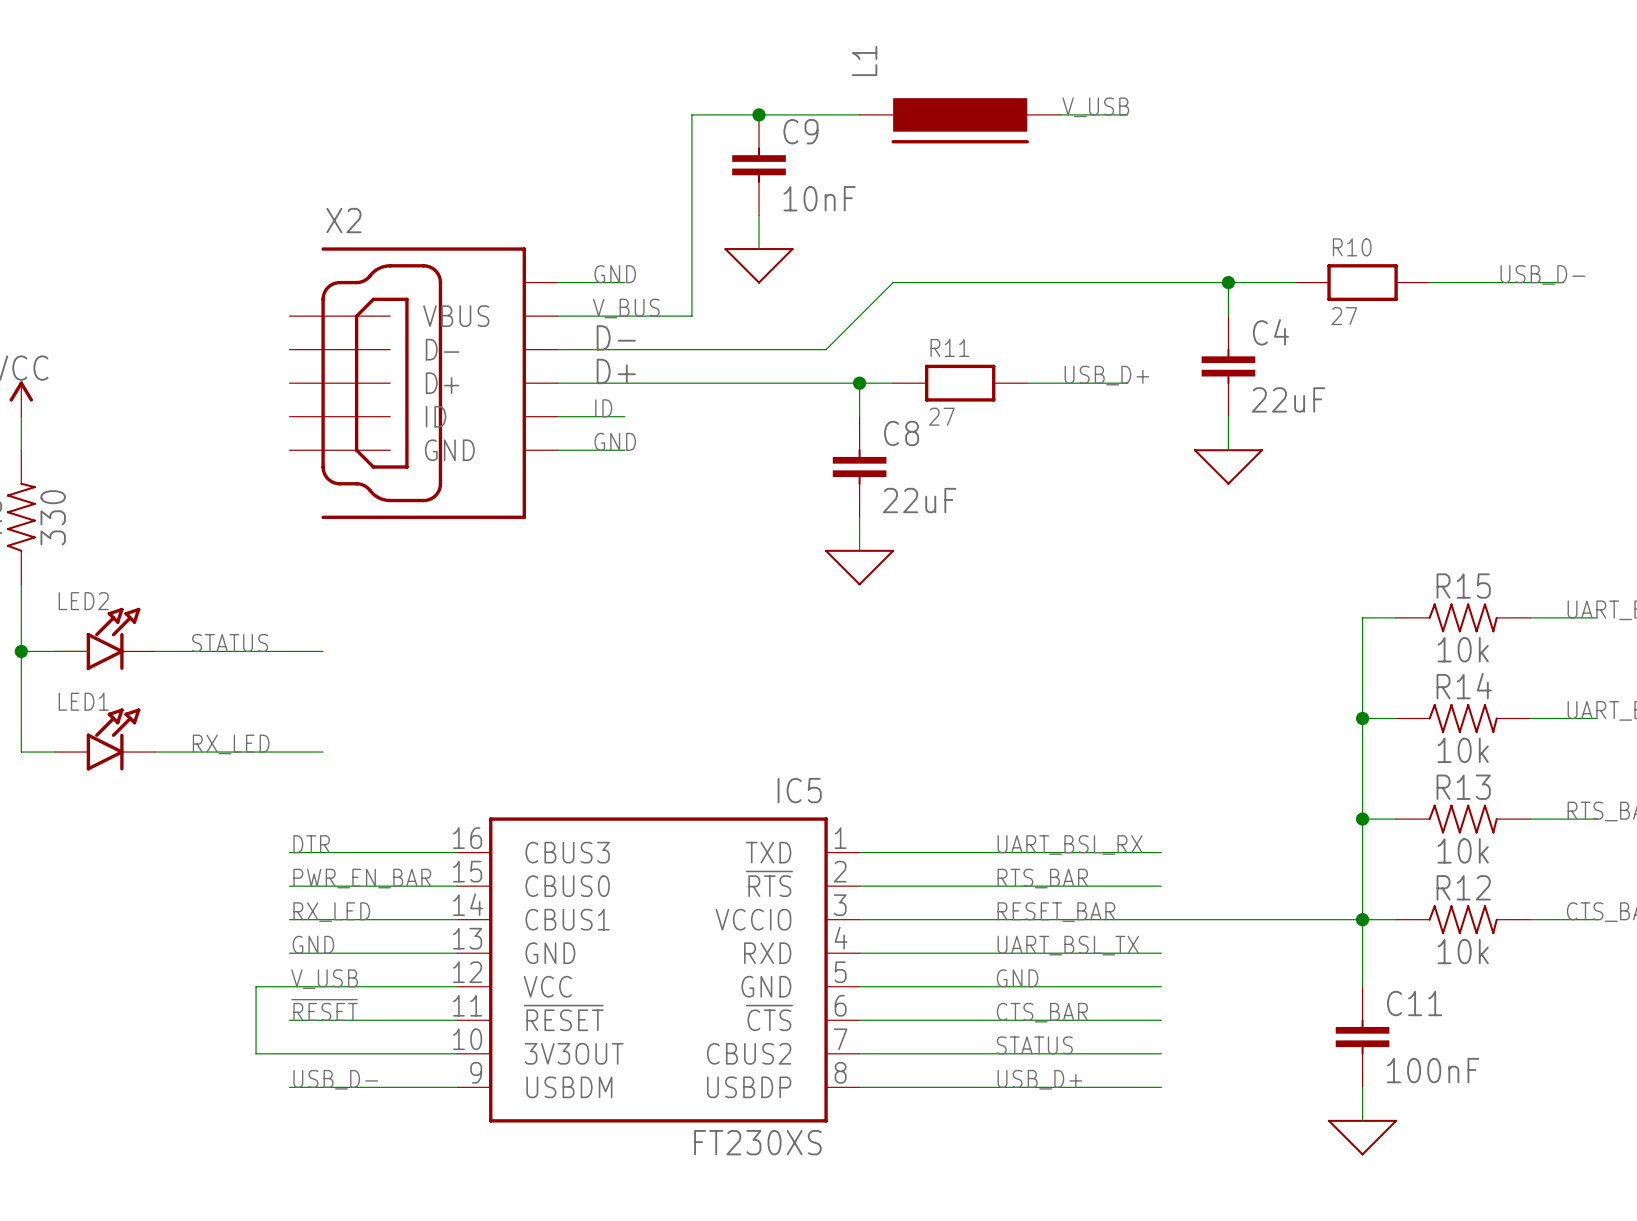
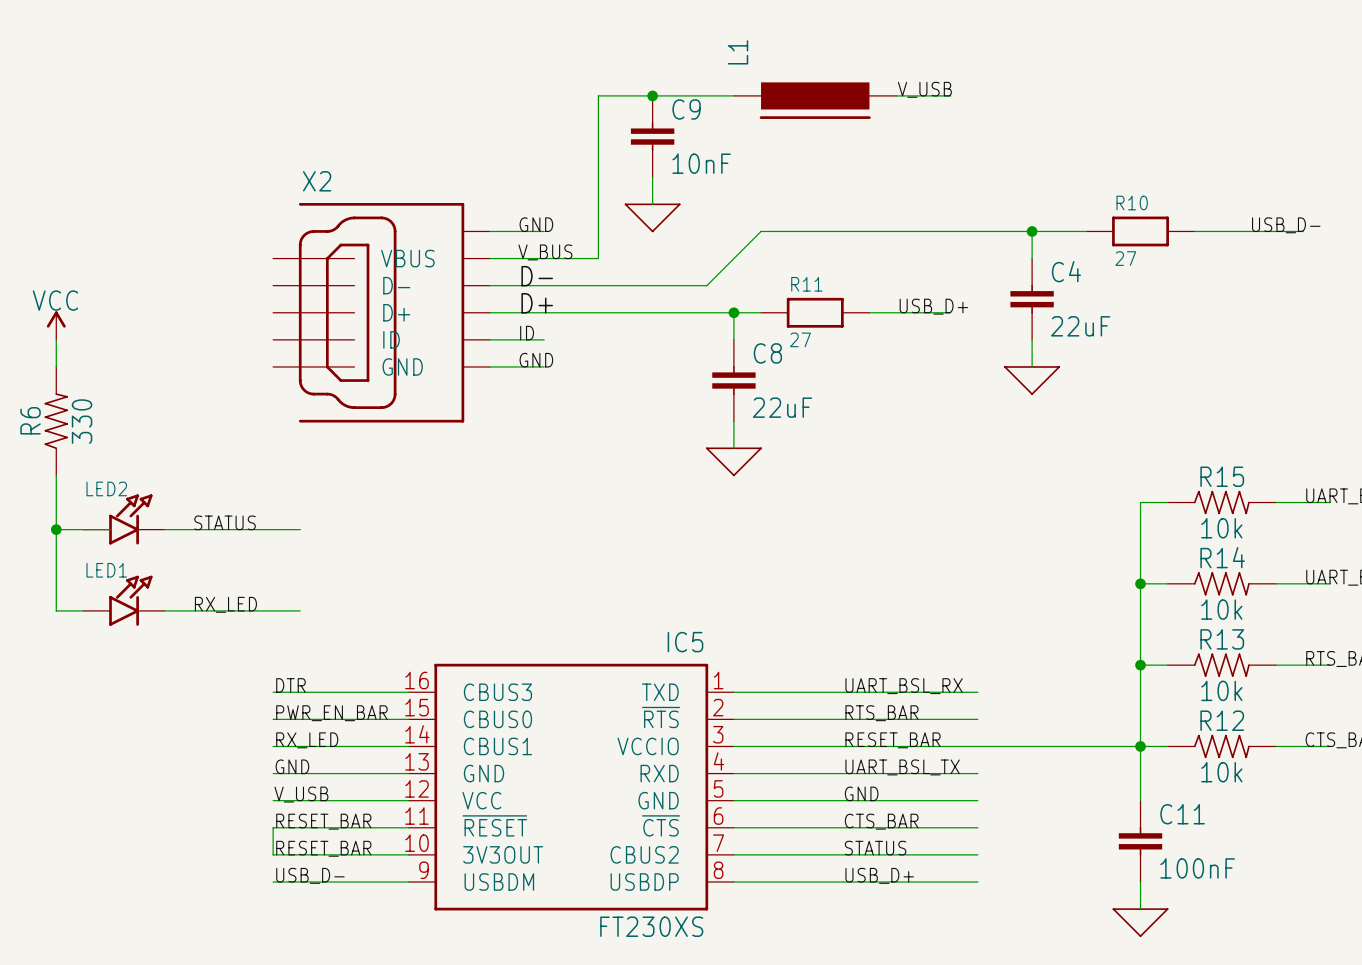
wire: (289, 986) (256, 986) (256, 1053) (289, 1053) -> (273, 827) (273, 854)
label: ~{RESET} (324, 1009) -> RESET_BAR (323, 821)
label: none -> RESET_BAR (323, 848)

